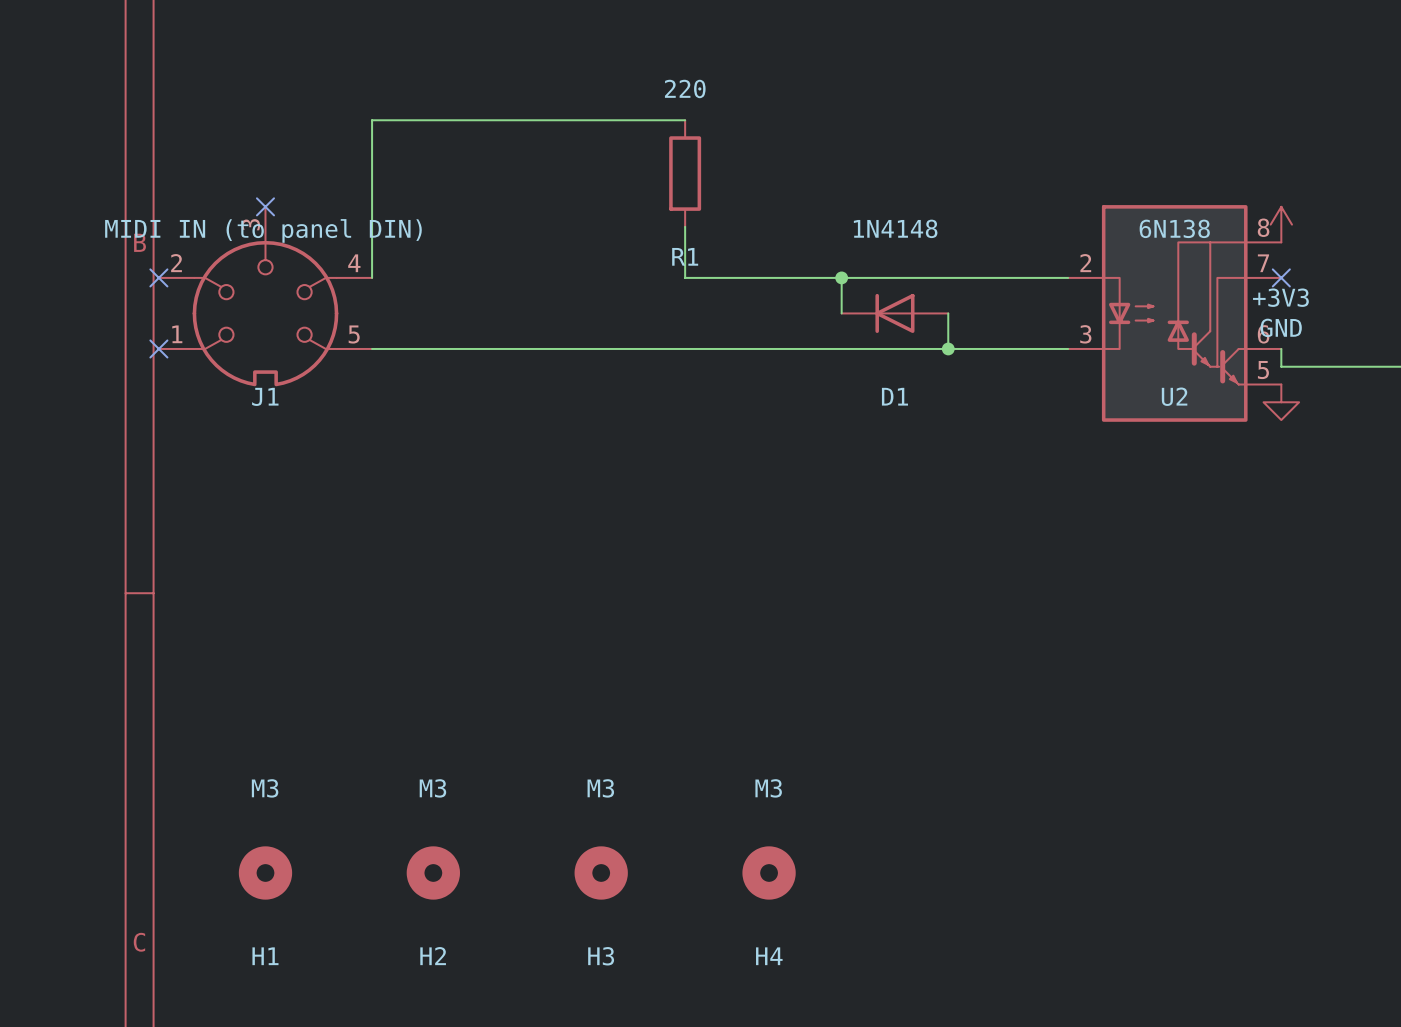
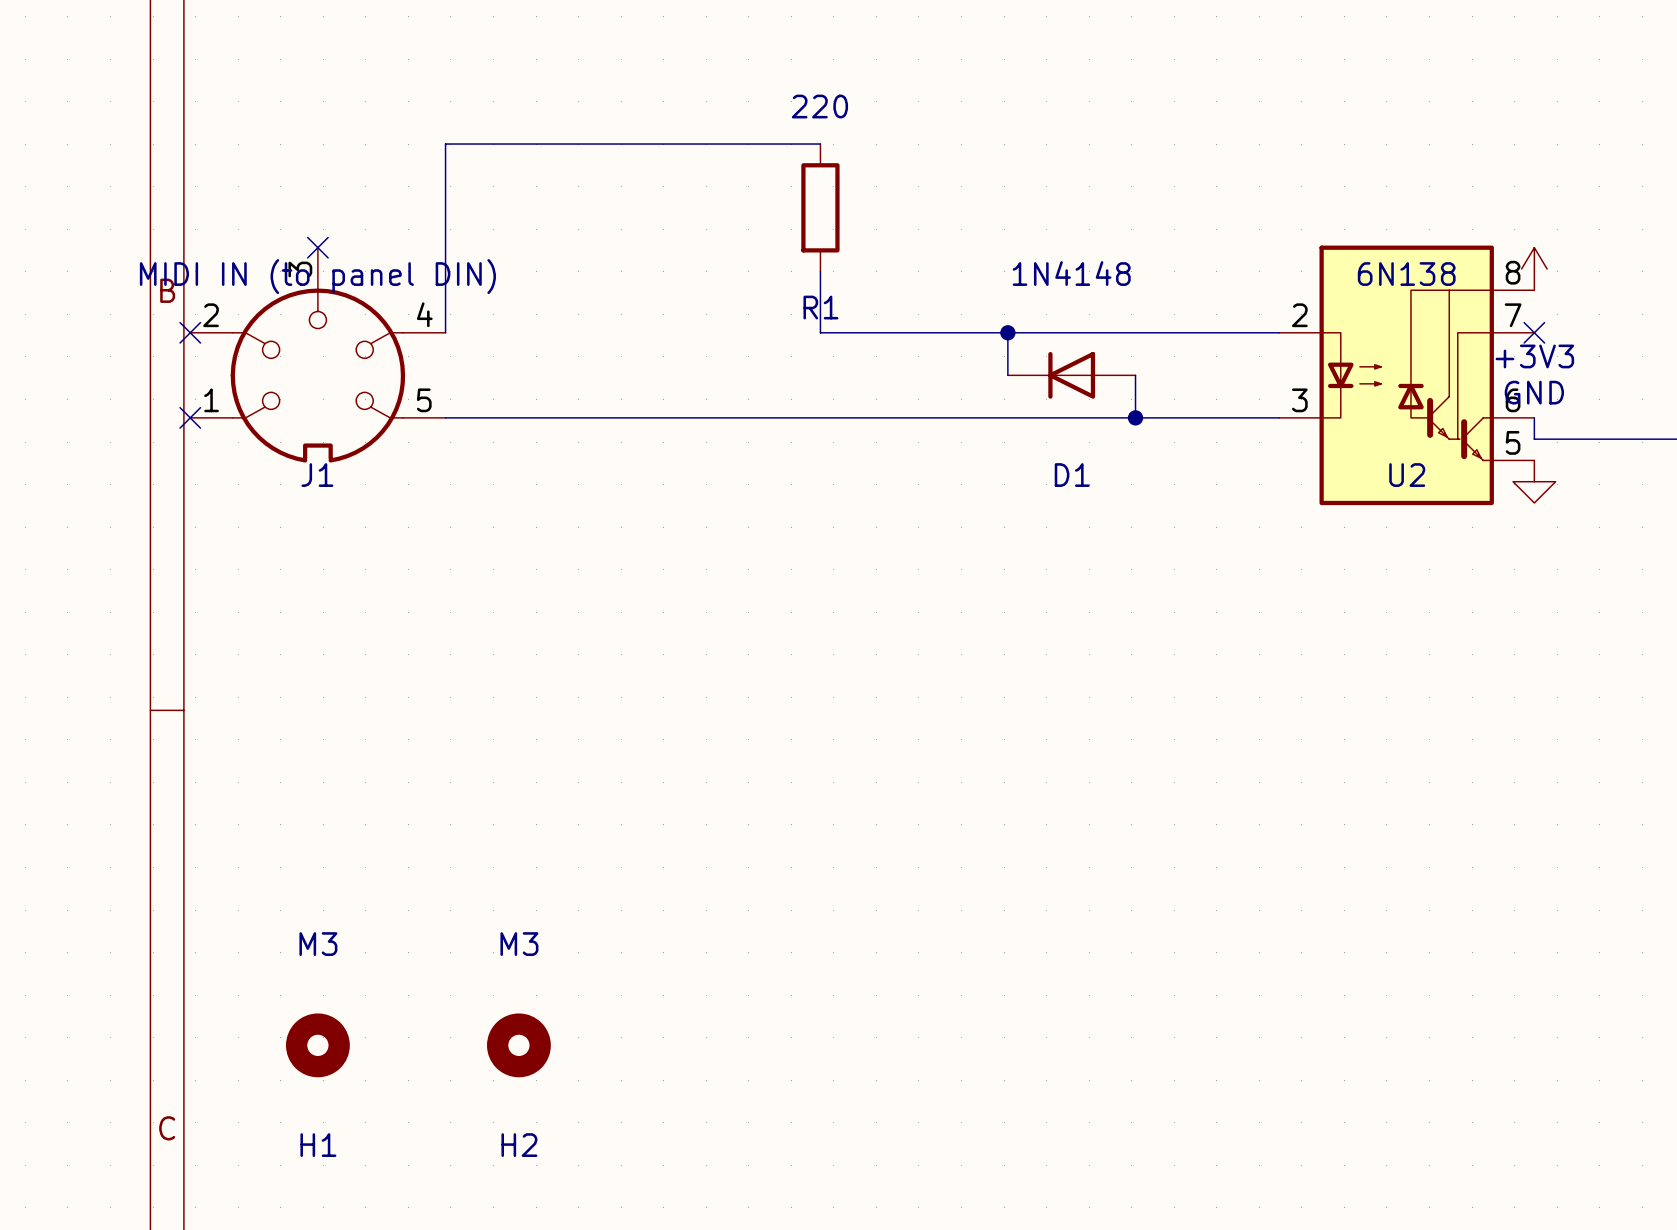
H3: M3 (601, 872) -> none
H4: M3 (769, 872) -> none

